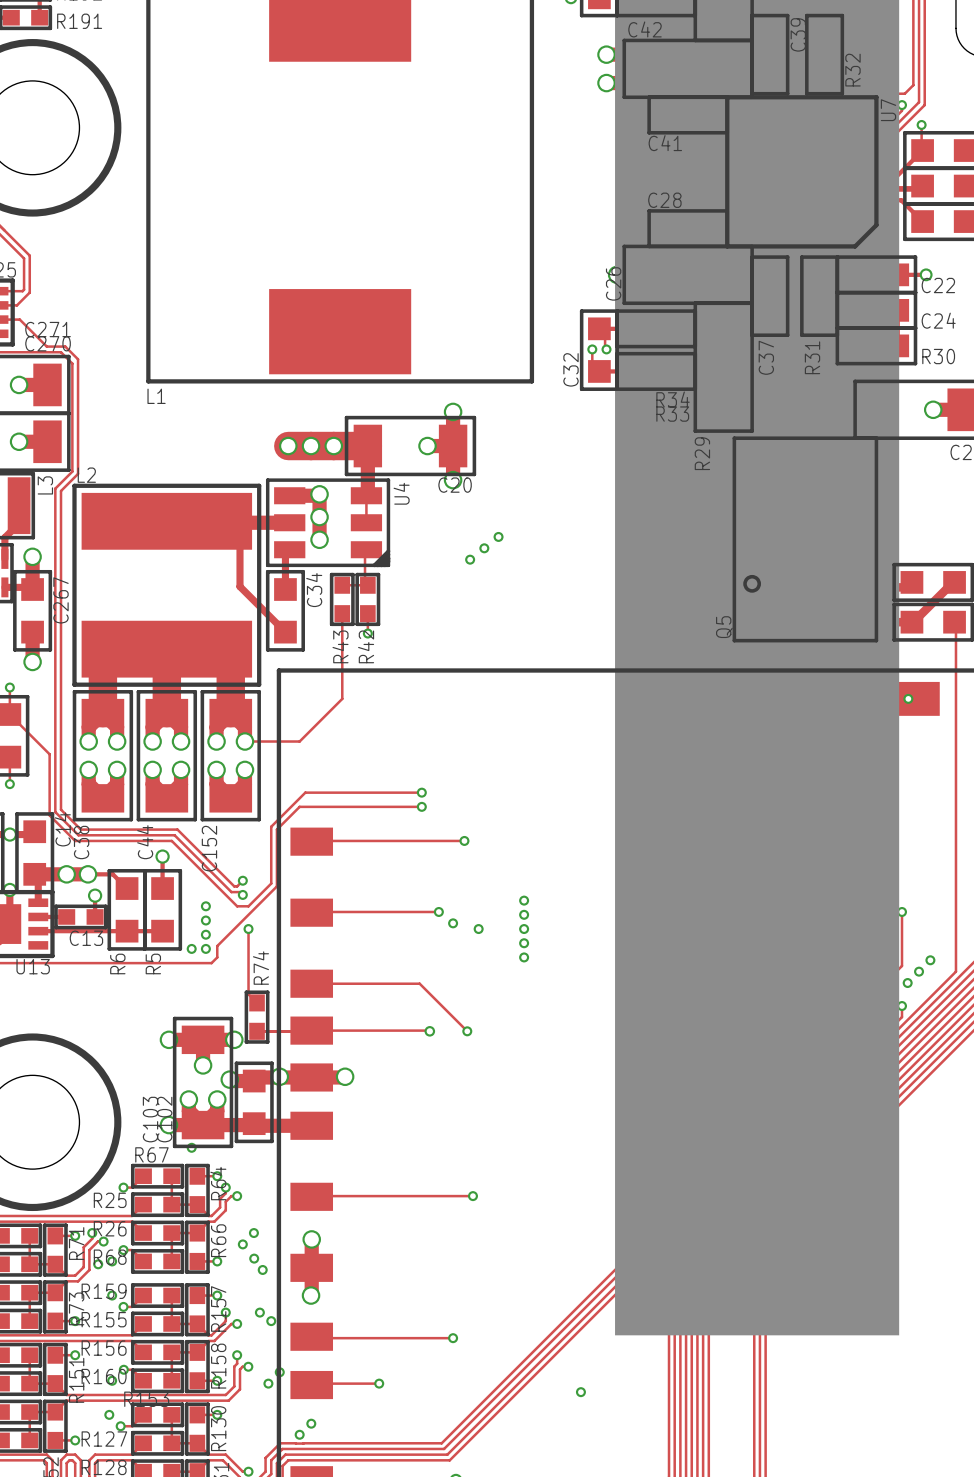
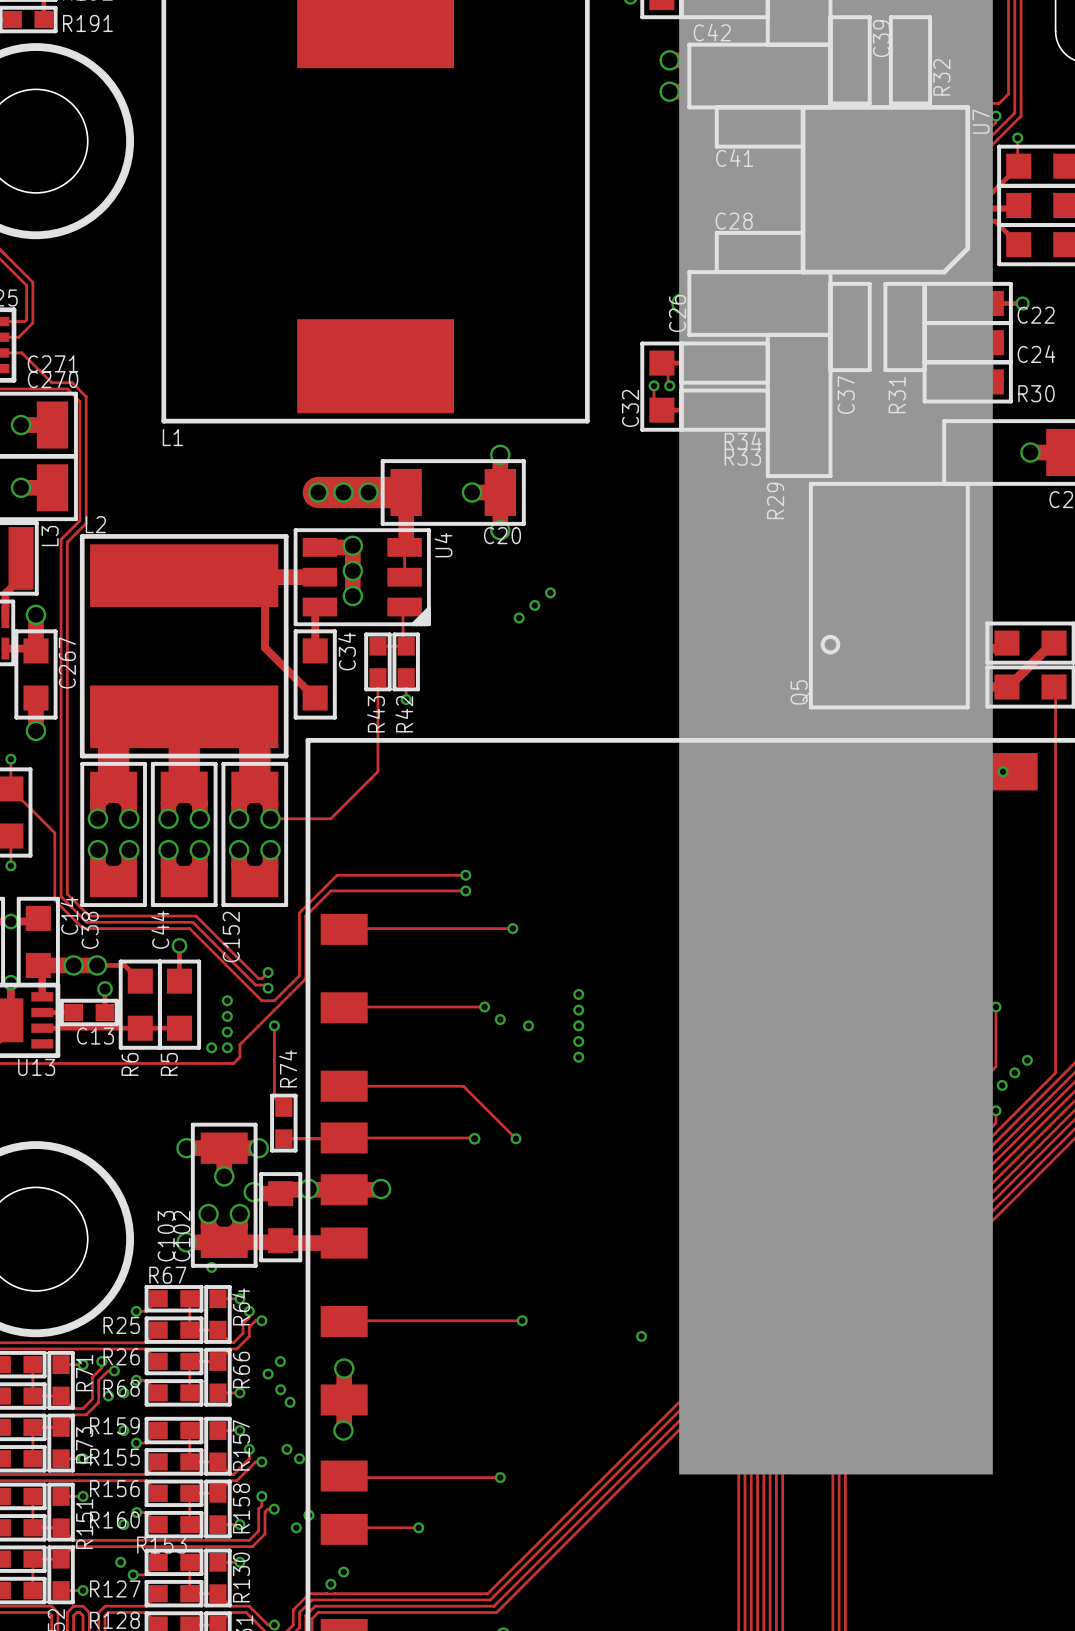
via: none -> (641, 1336)
via: (580, 1392) -> none

